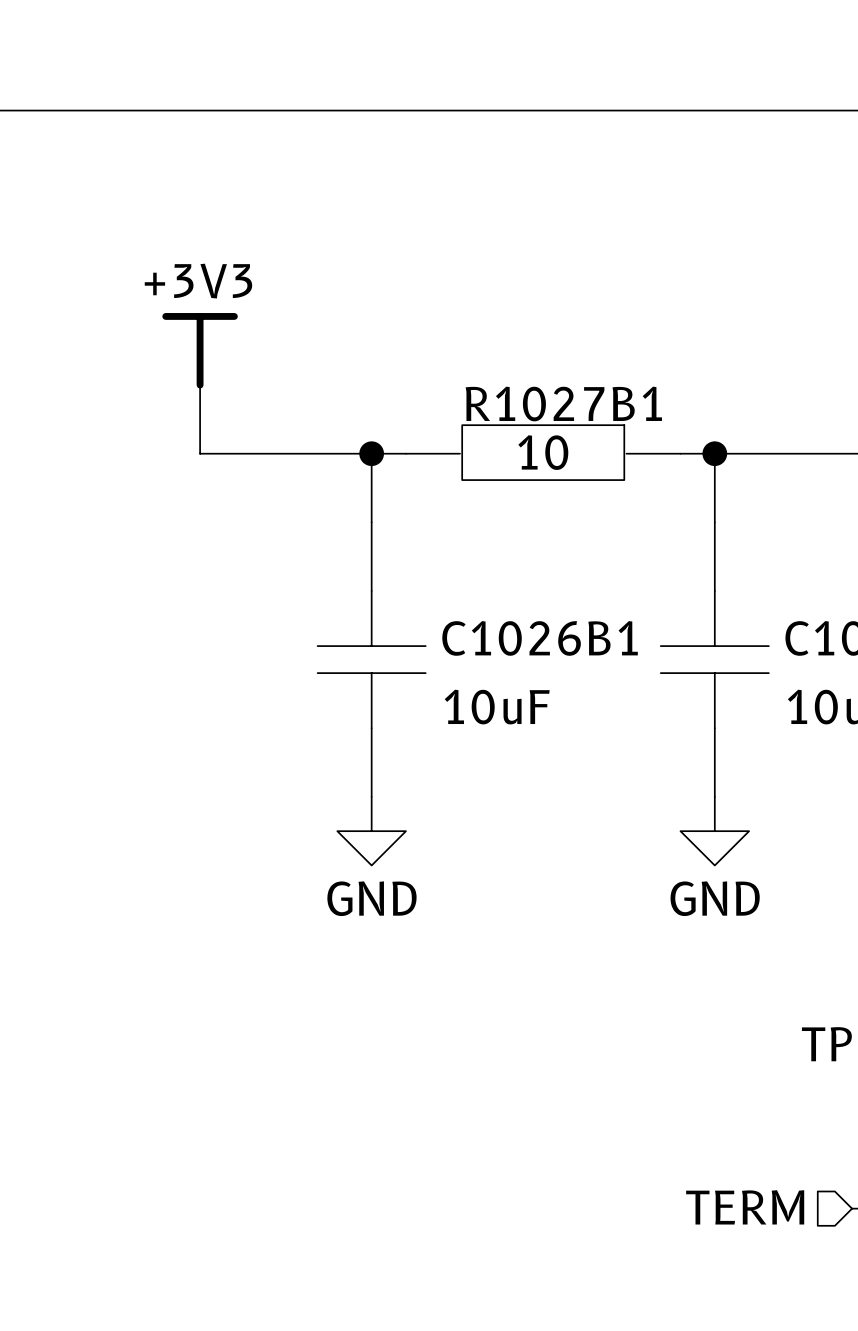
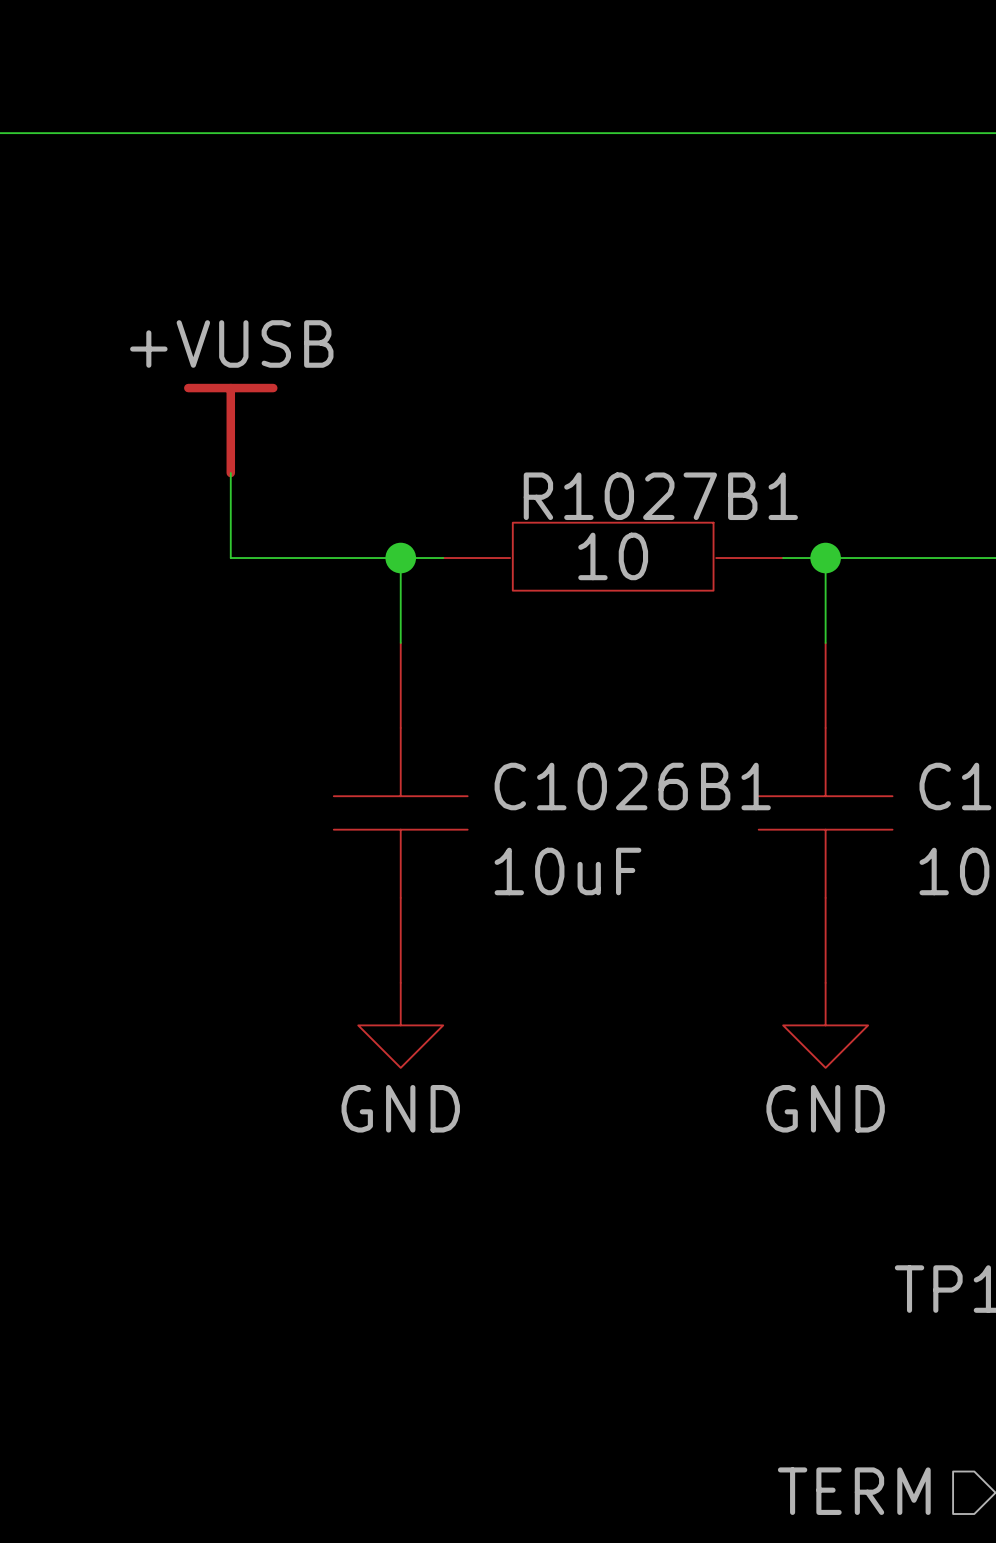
power symbol: +3V3 (200, 350) -> none
power symbol: none -> +VUSB (230, 430)
wire: (200, 385) (200, 453) (234, 453) -> (230, 473) (230, 558)

